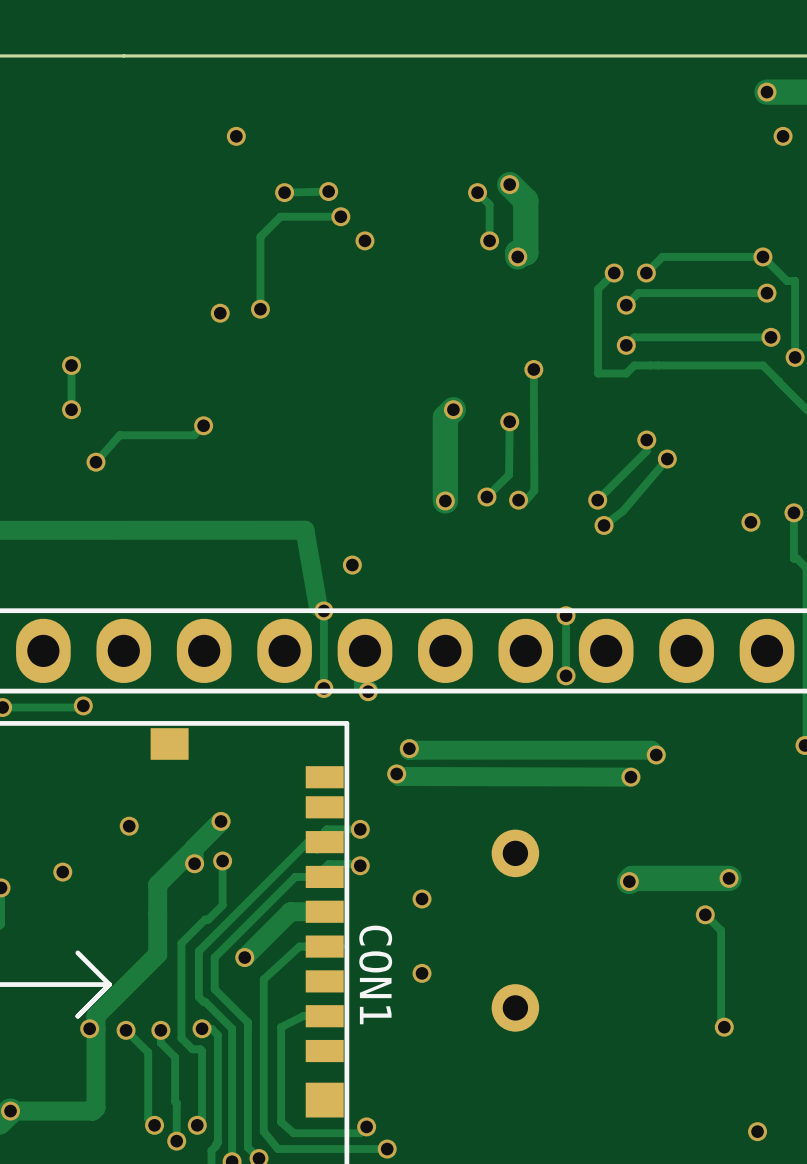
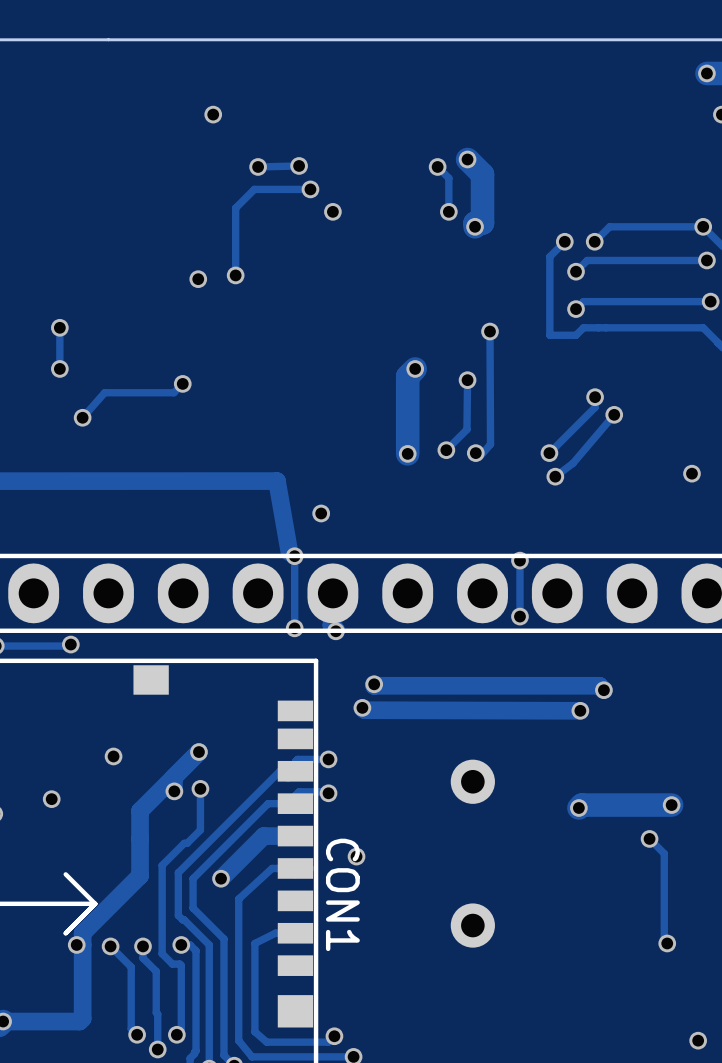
via: (422, 899) -> none
via: none -> (356, 856)
via: (422, 973) -> none

